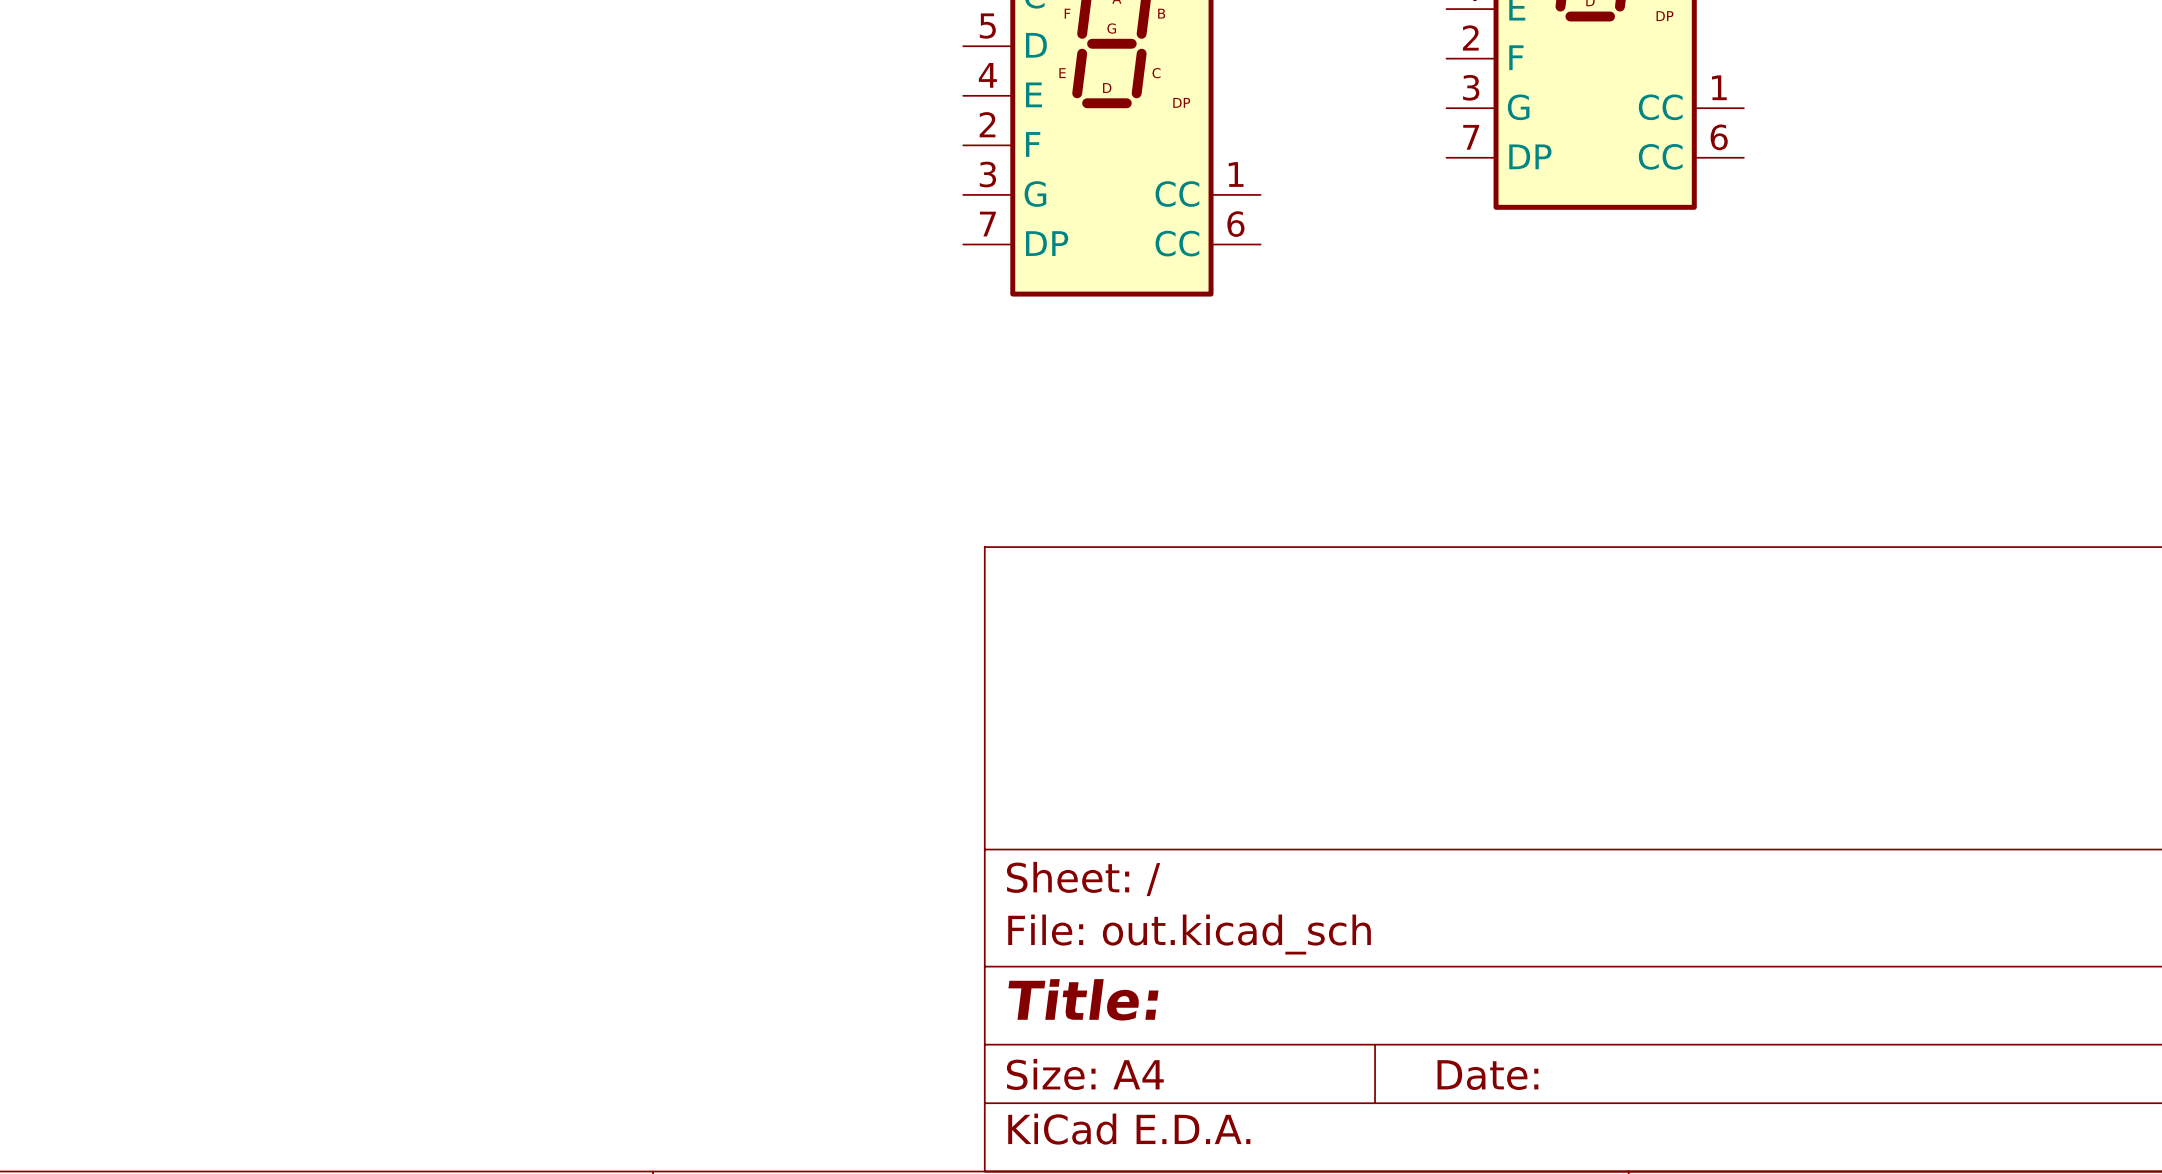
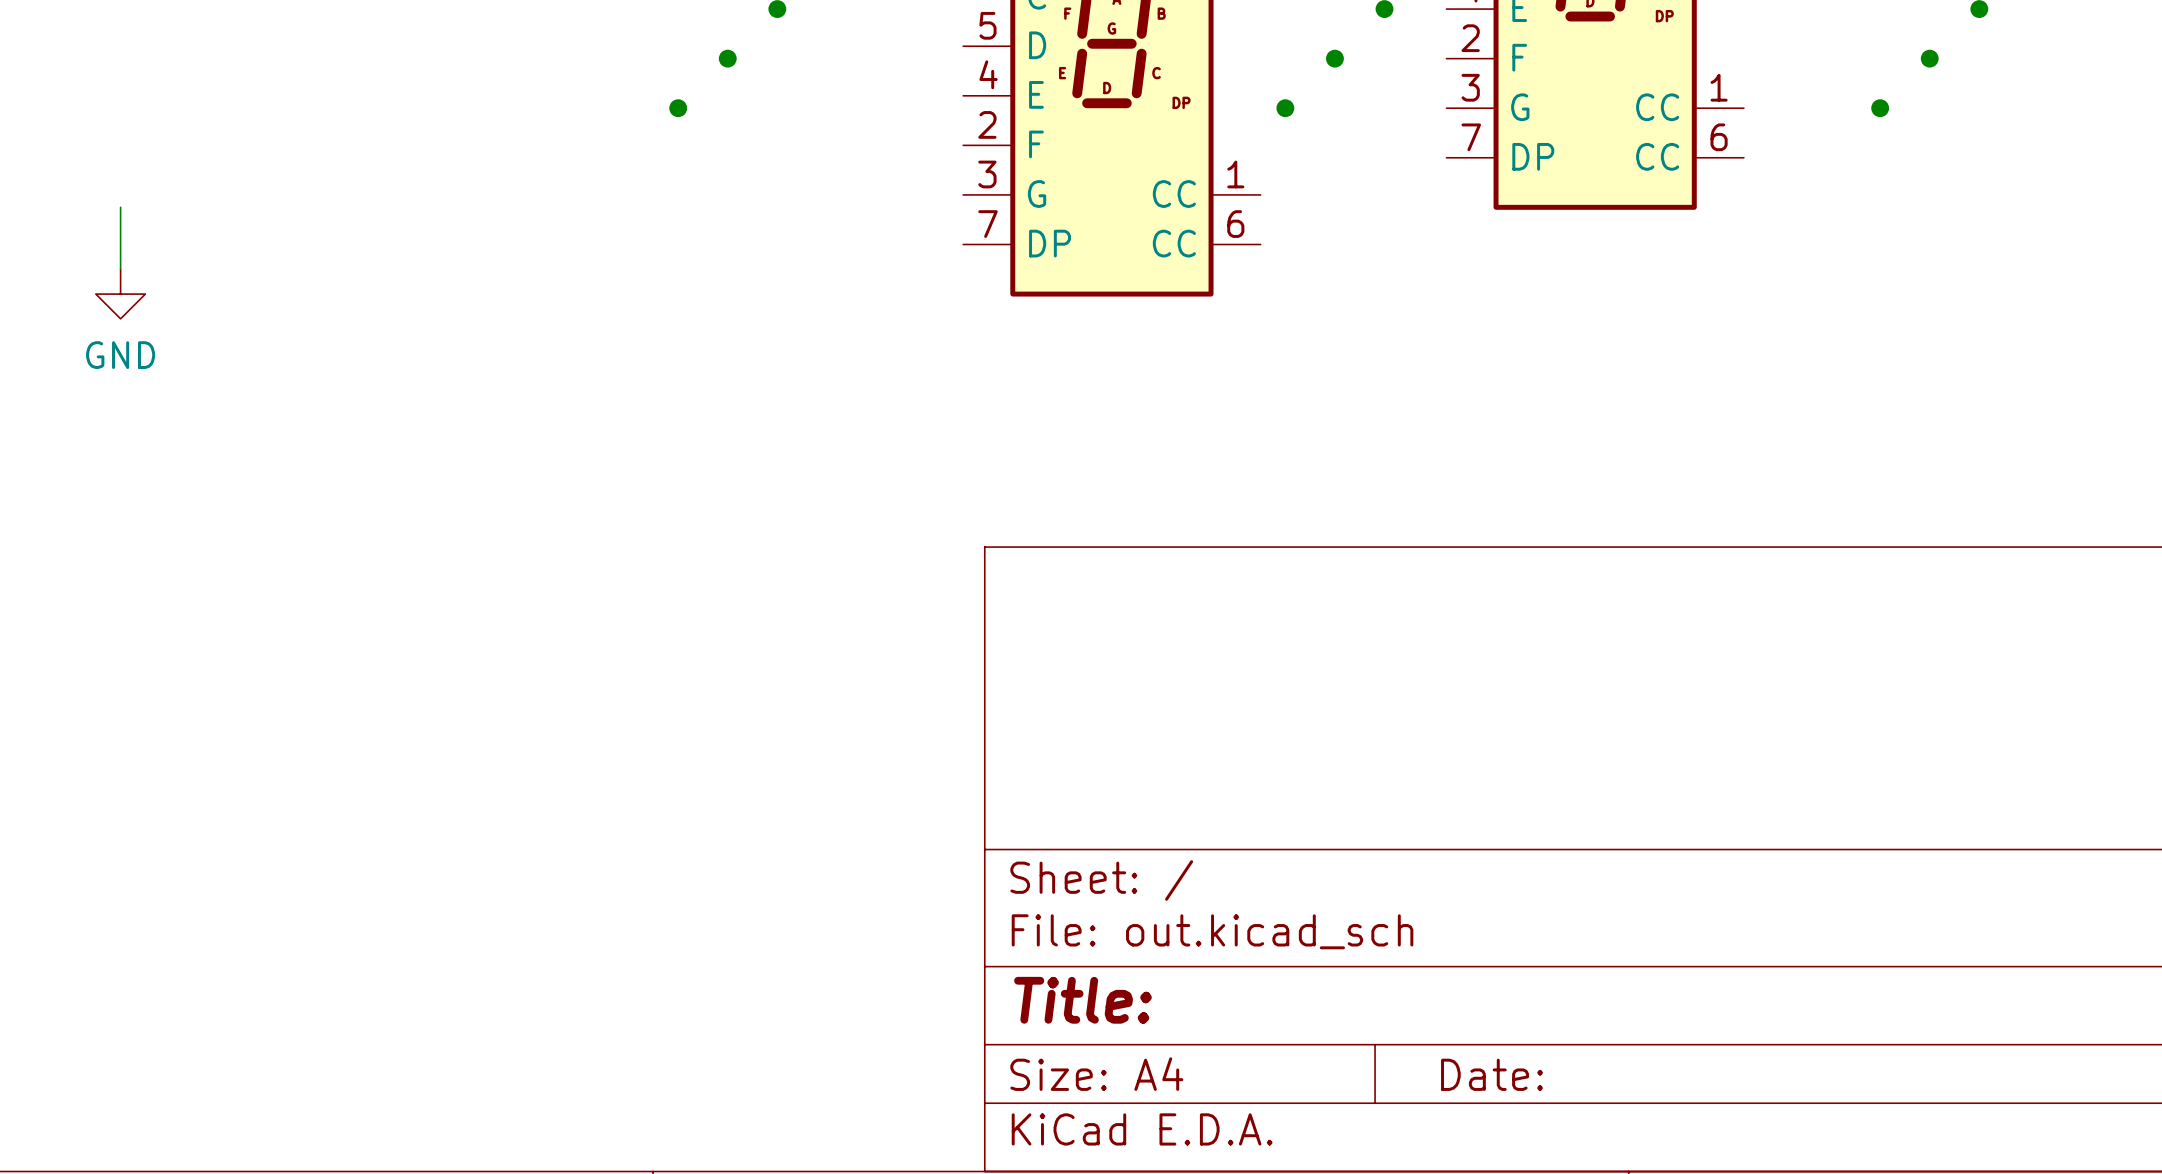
junction: none -> (777, 9)
junction: none -> (1384, 9)
junction: none -> (1979, 9)
junction: none -> (727, 58)
junction: none -> (1334, 58)
junction: none -> (1929, 58)
junction: none -> (678, 108)
junction: none -> (1285, 108)
junction: none -> (1880, 108)
wire: none -> (120, 207) (120, 269)
power symbol: none -> GND (120, 294)

